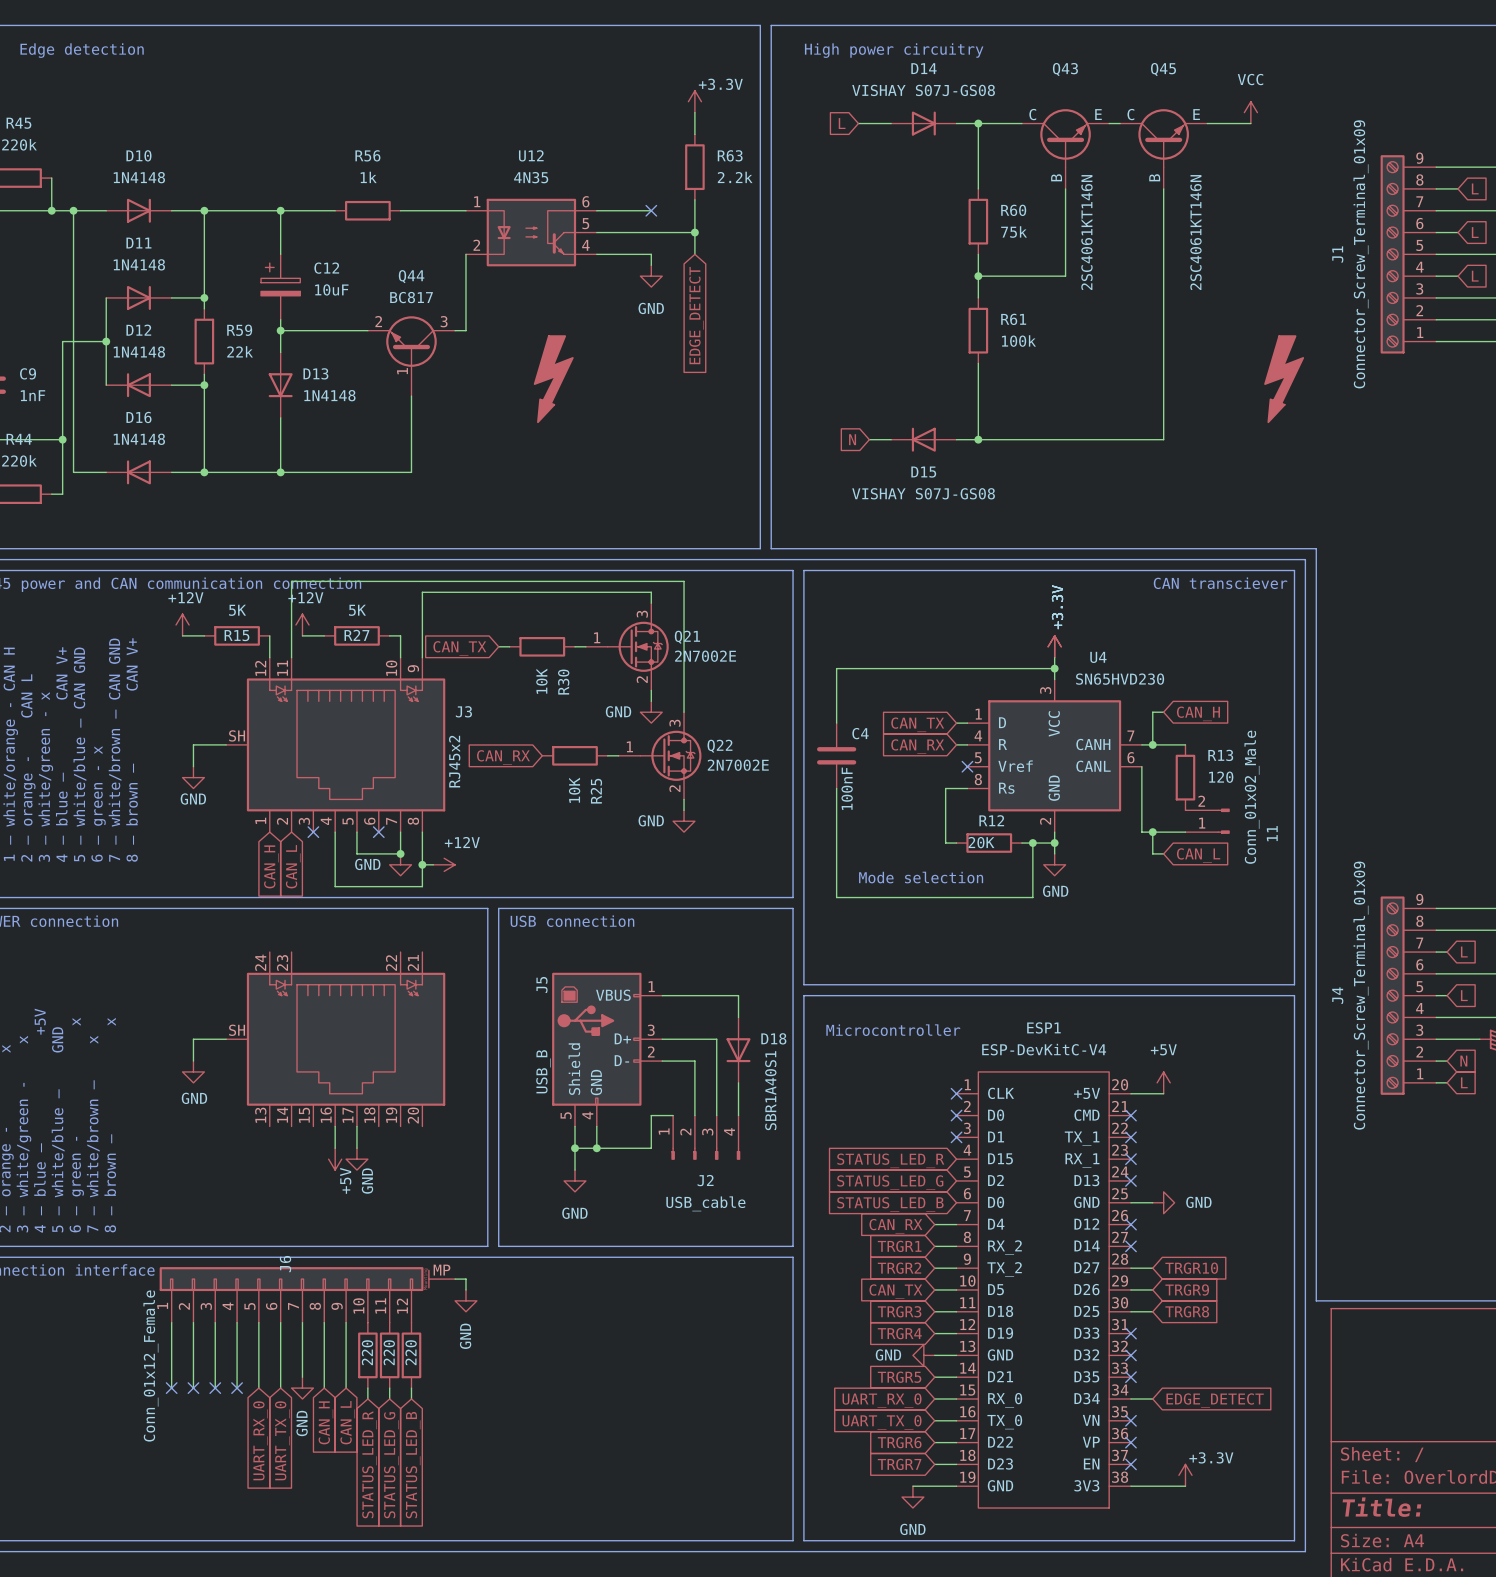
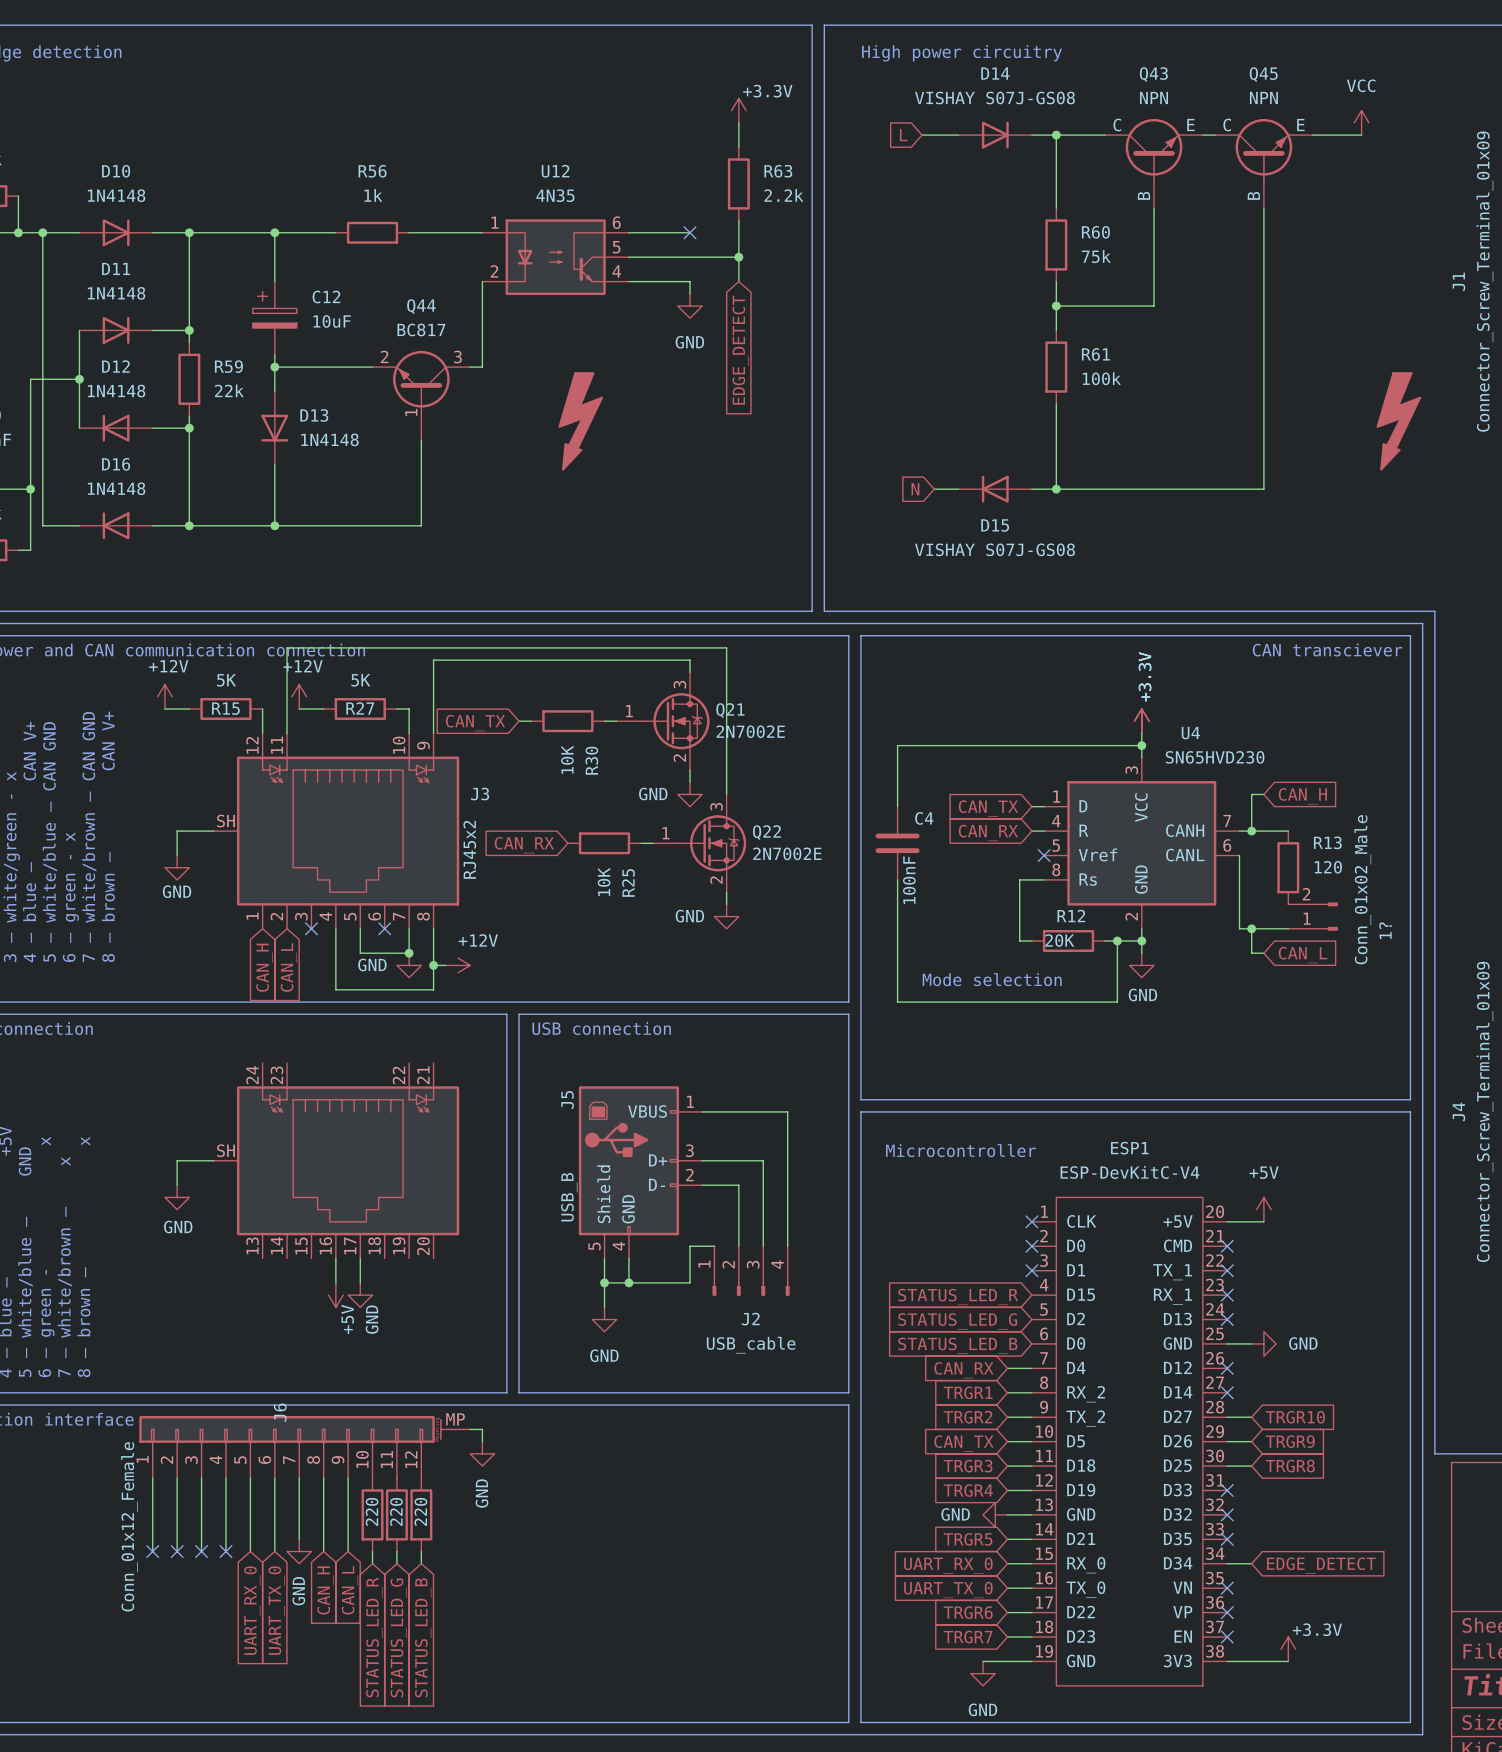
Q43 value: 2SC4061KT146N (1086, 232) -> NPN (1154, 97)
Q45 value: 2SC4061KT146N (1195, 232) -> NPN (1263, 97)
11 name: 11 (1272, 833) -> 1? (1385, 930)
D18: SBR1A40S1 (738, 1050) -> none

